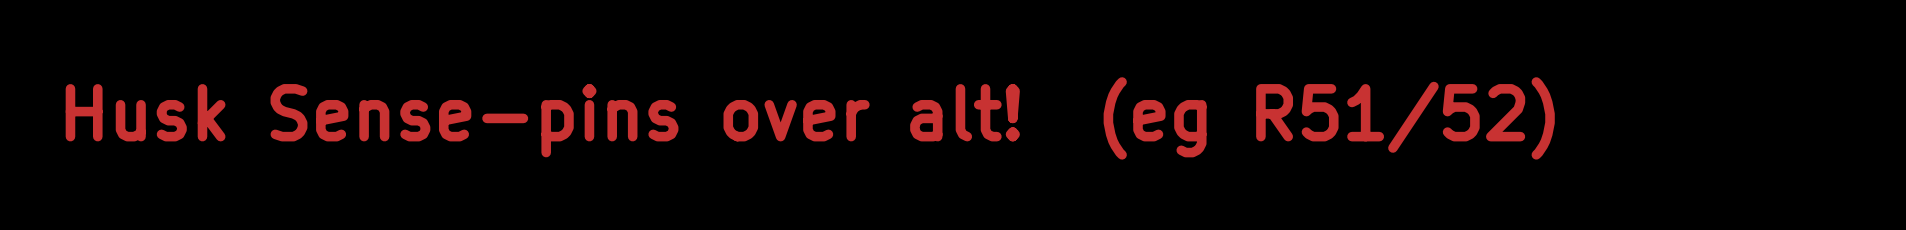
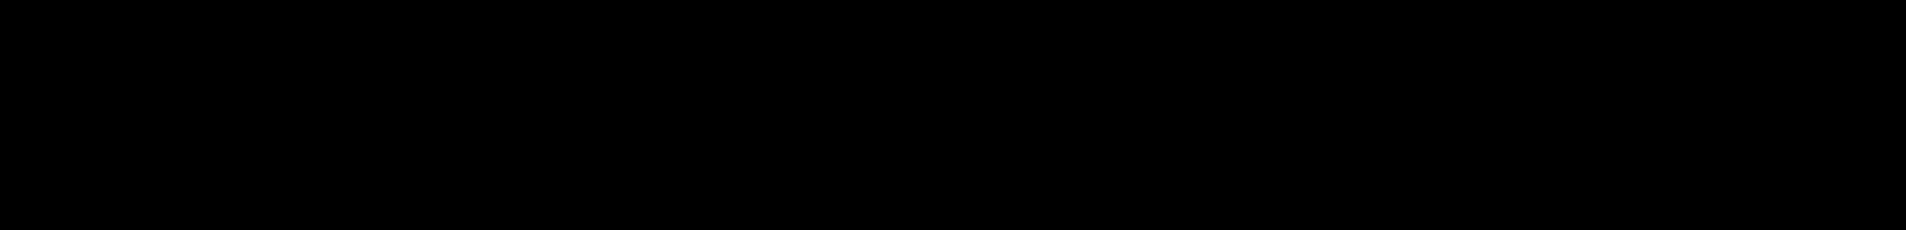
text: Husk Sense-pins over alt! (eg R51/52) (810, 118) -> none

